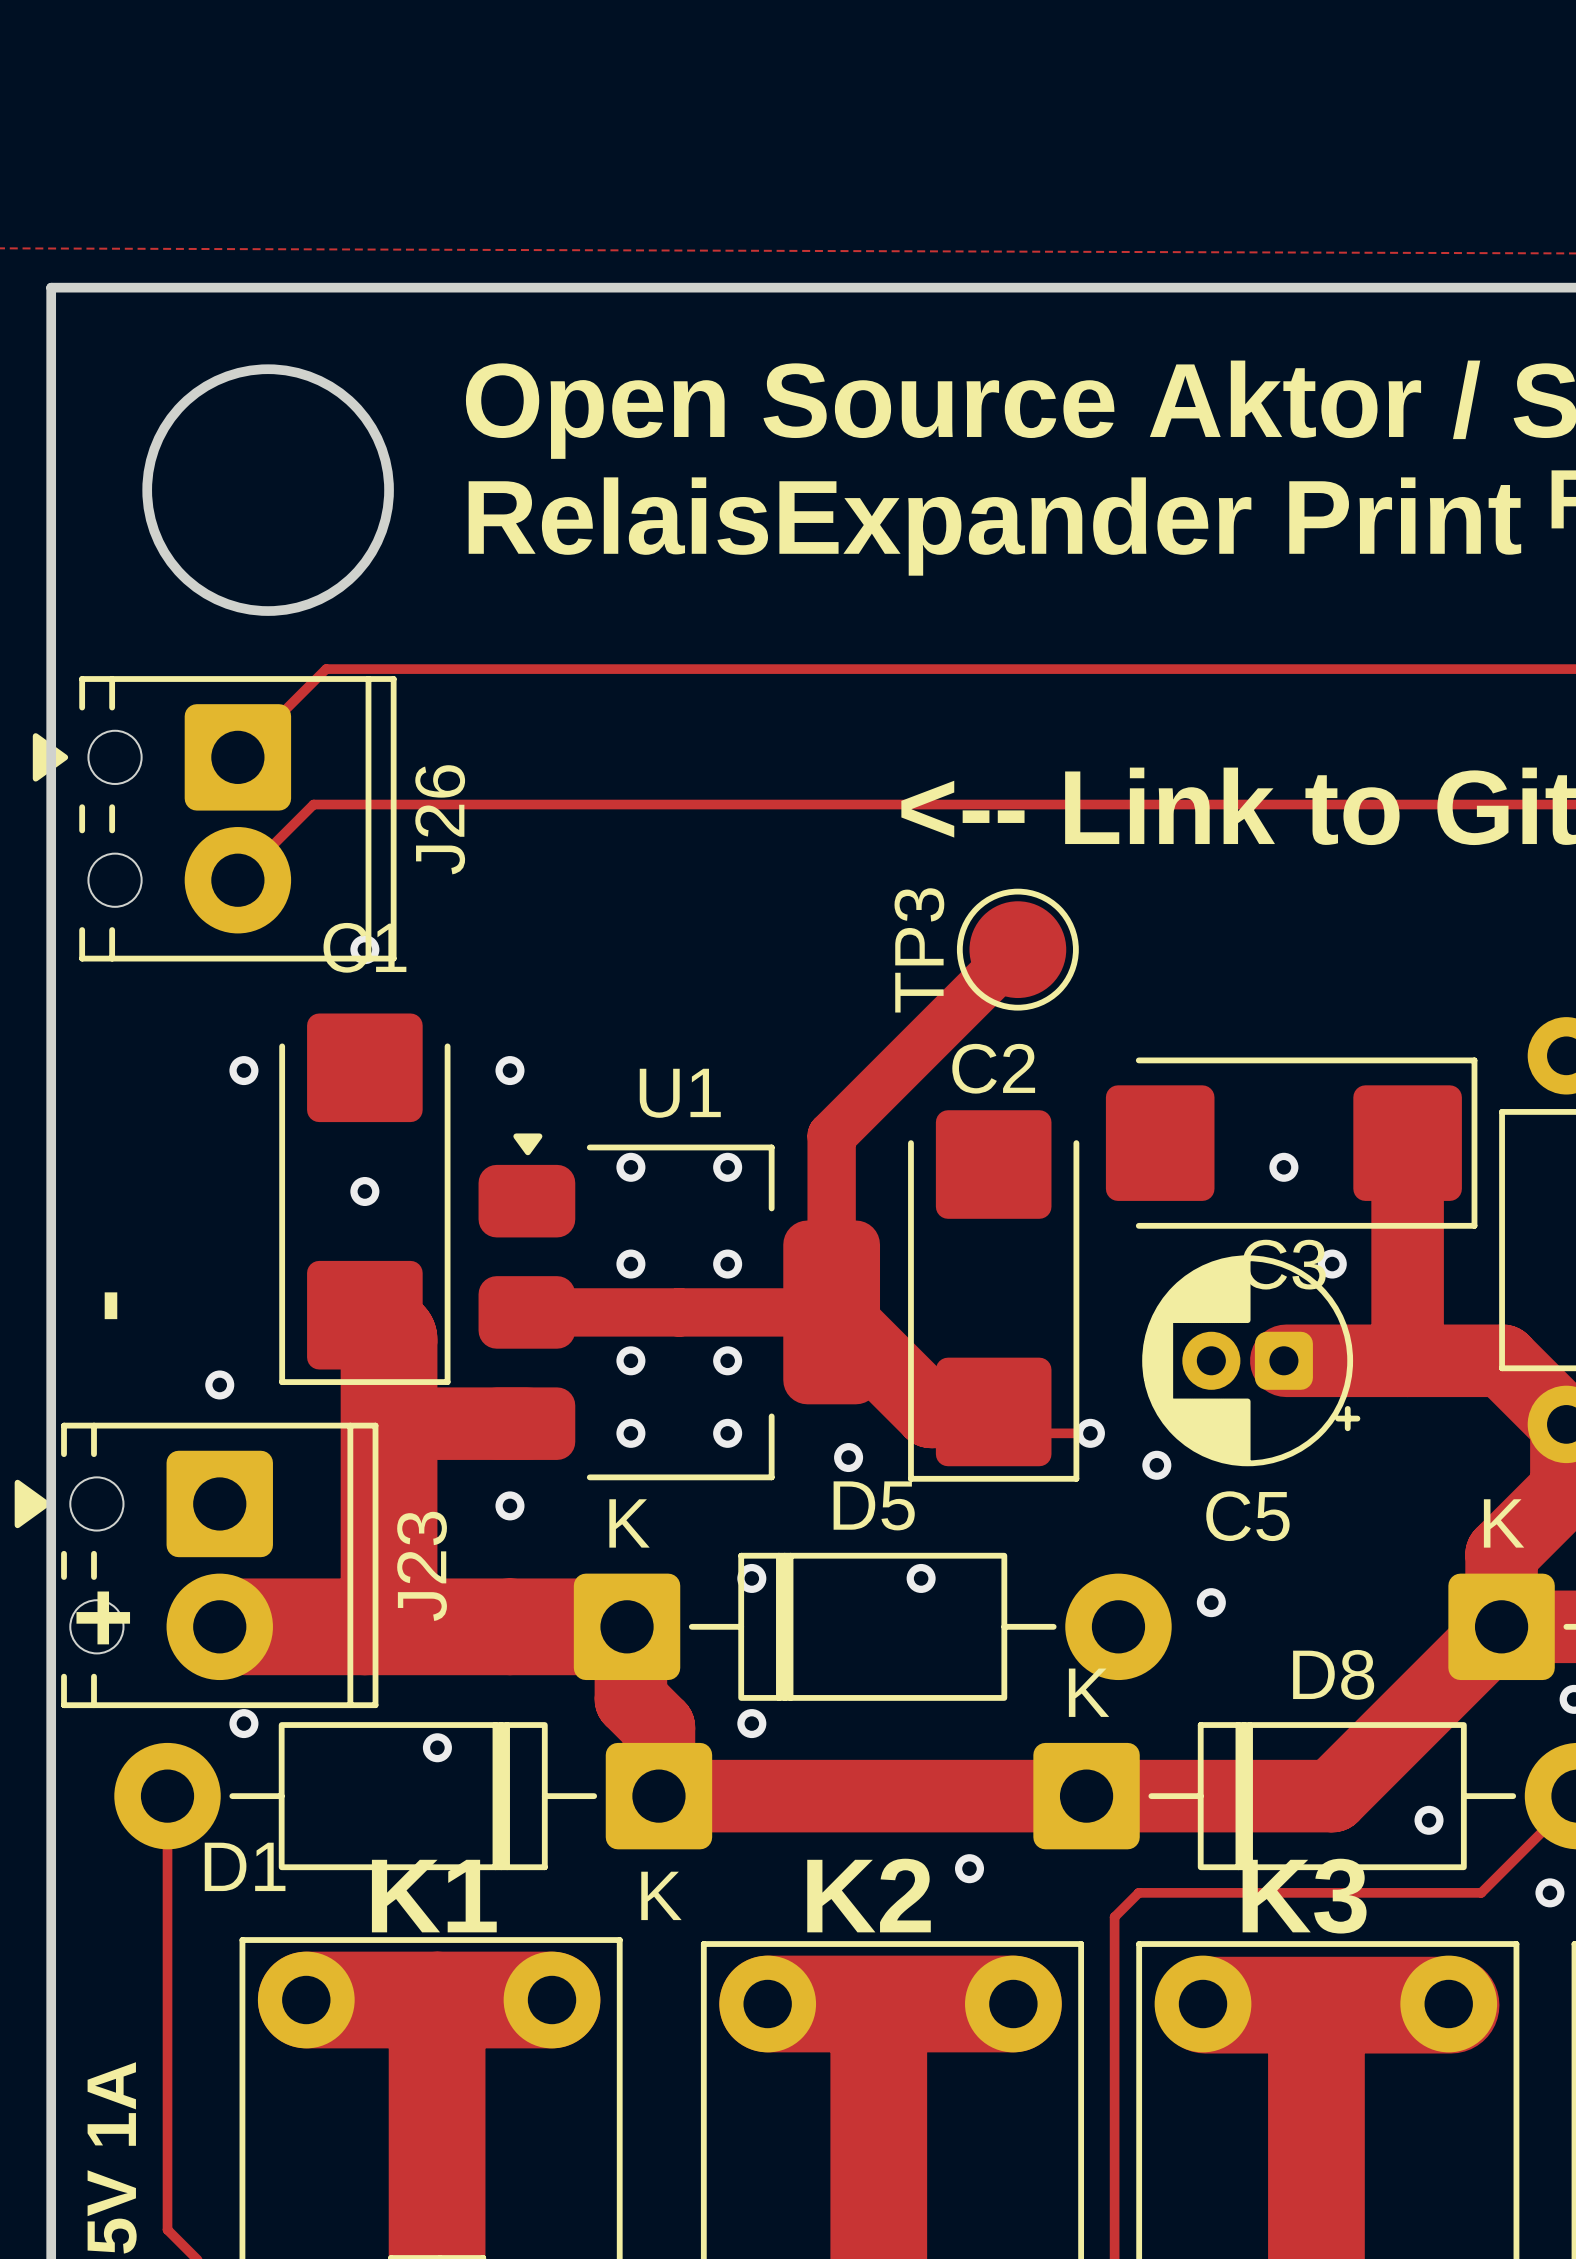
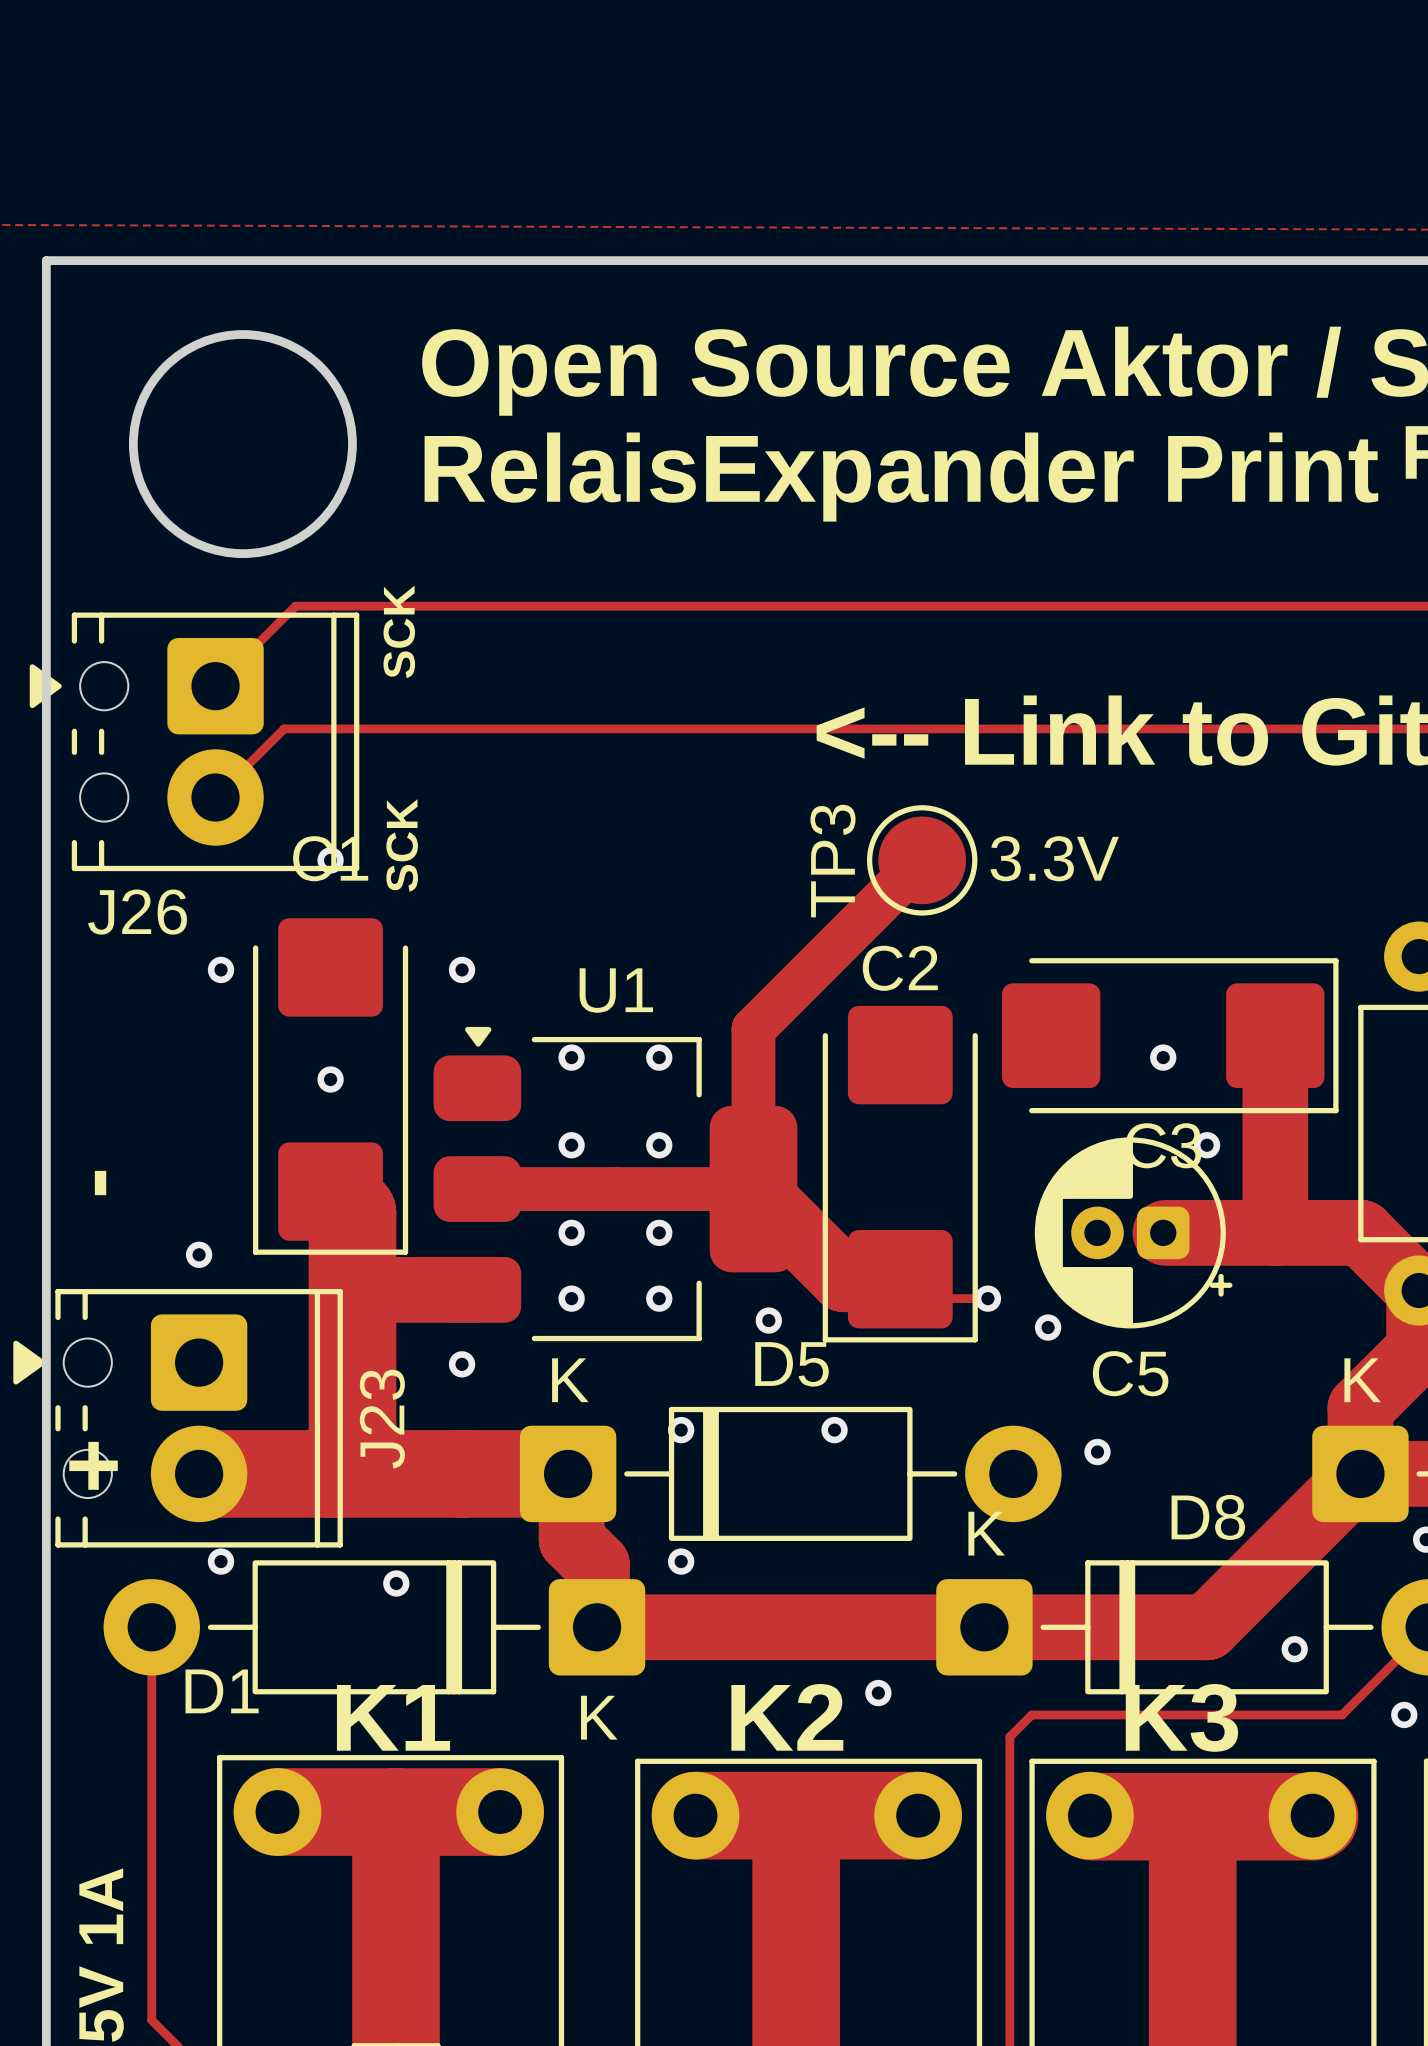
text: none -> SCK (399, 631)
J26 name rotation: 0° (440, 819) -> 90° clockwise (137, 912)
J26 name position: J26 (440, 819) -> J26 (137, 912)
text: none -> SCK (402, 845)
TP3 value: none -> 3.3V (1054, 858)

